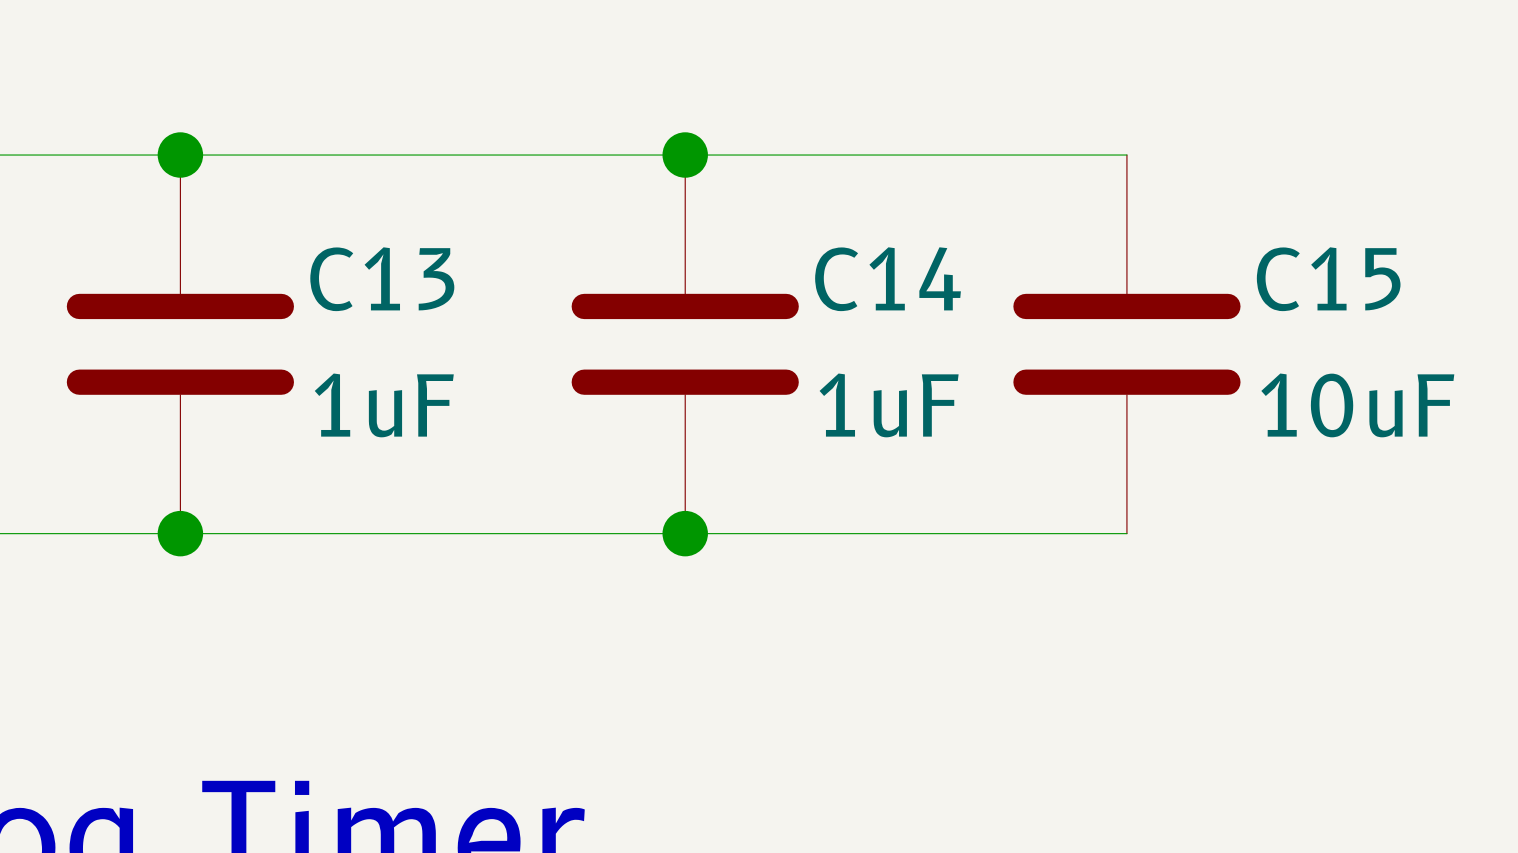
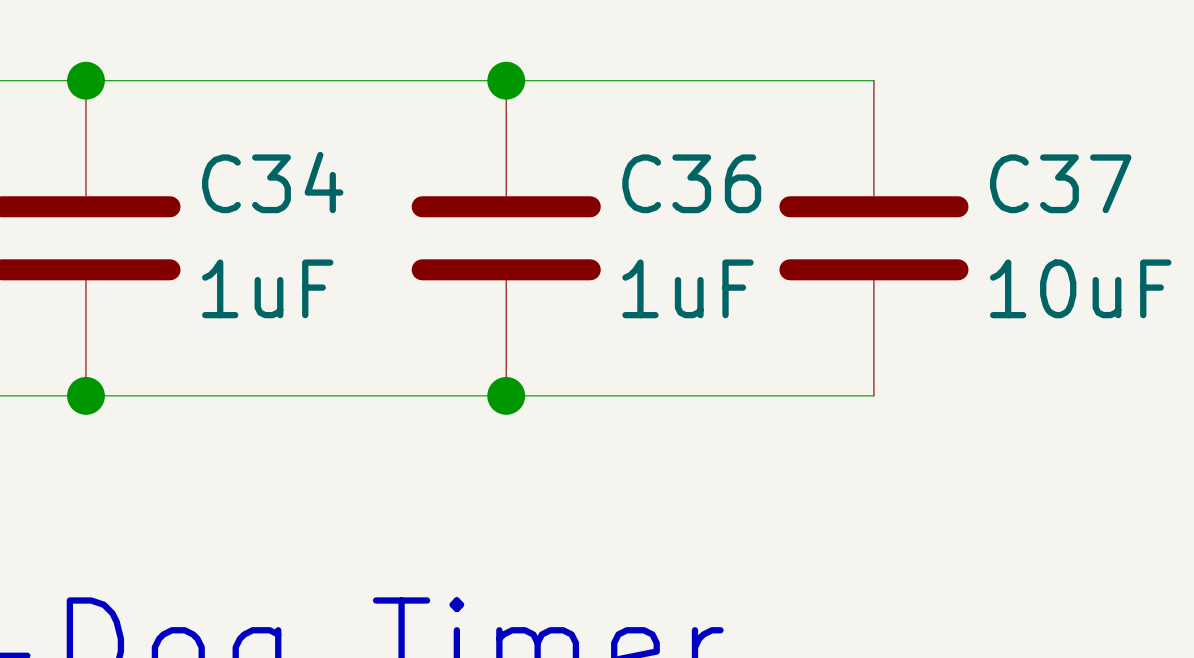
C13 name: C13 (382, 279) -> C34 (272, 182)
C14 name: C14 (888, 279) -> C36 (691, 183)
C15 name: C15 (1328, 279) -> C37 (1060, 183)

